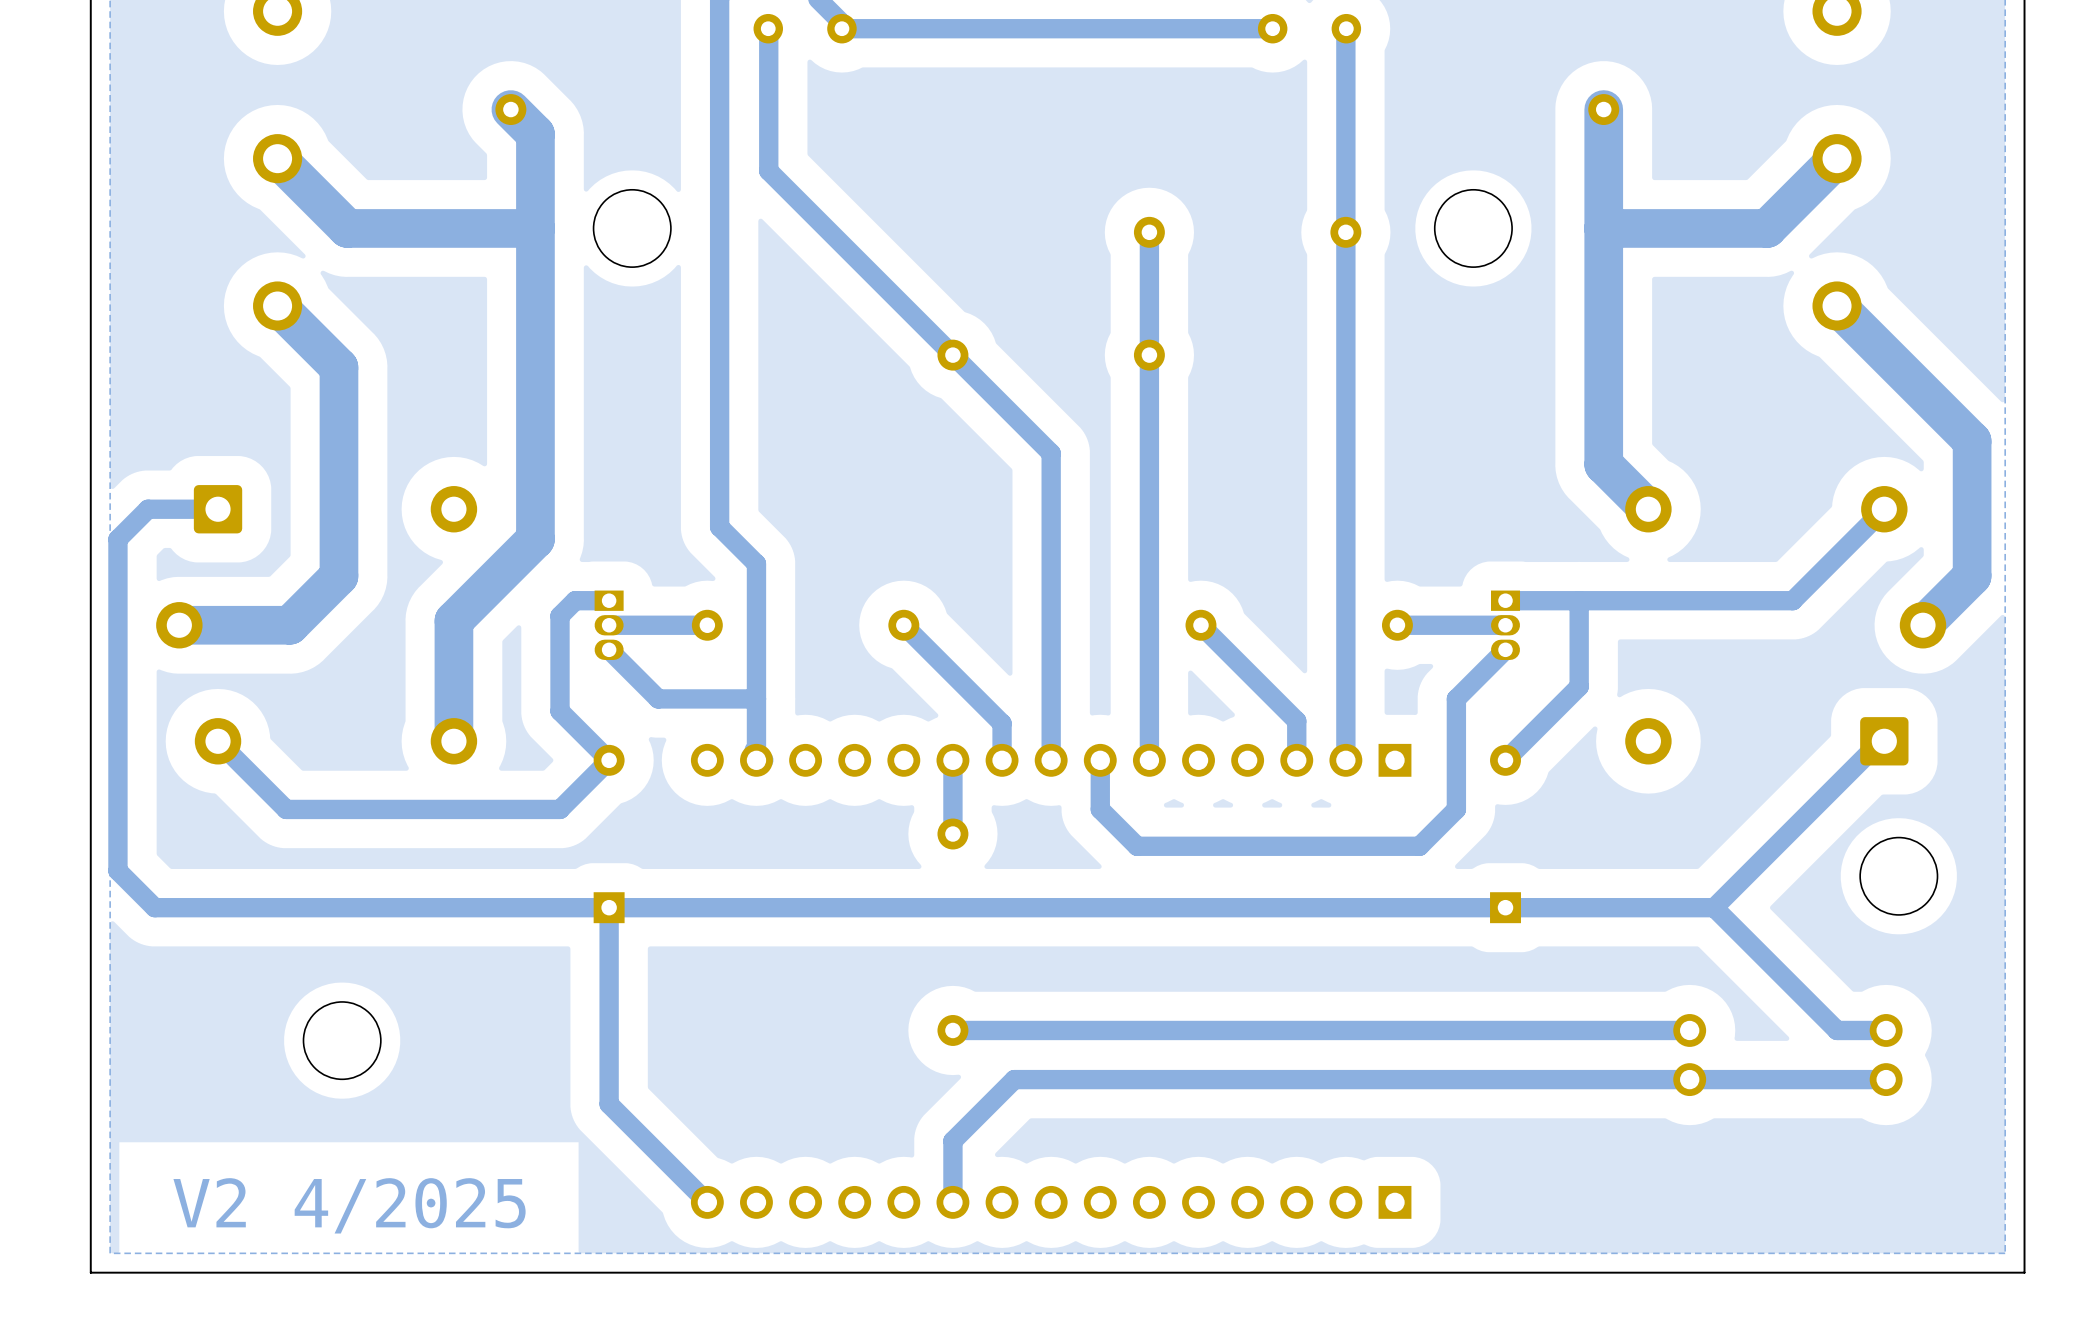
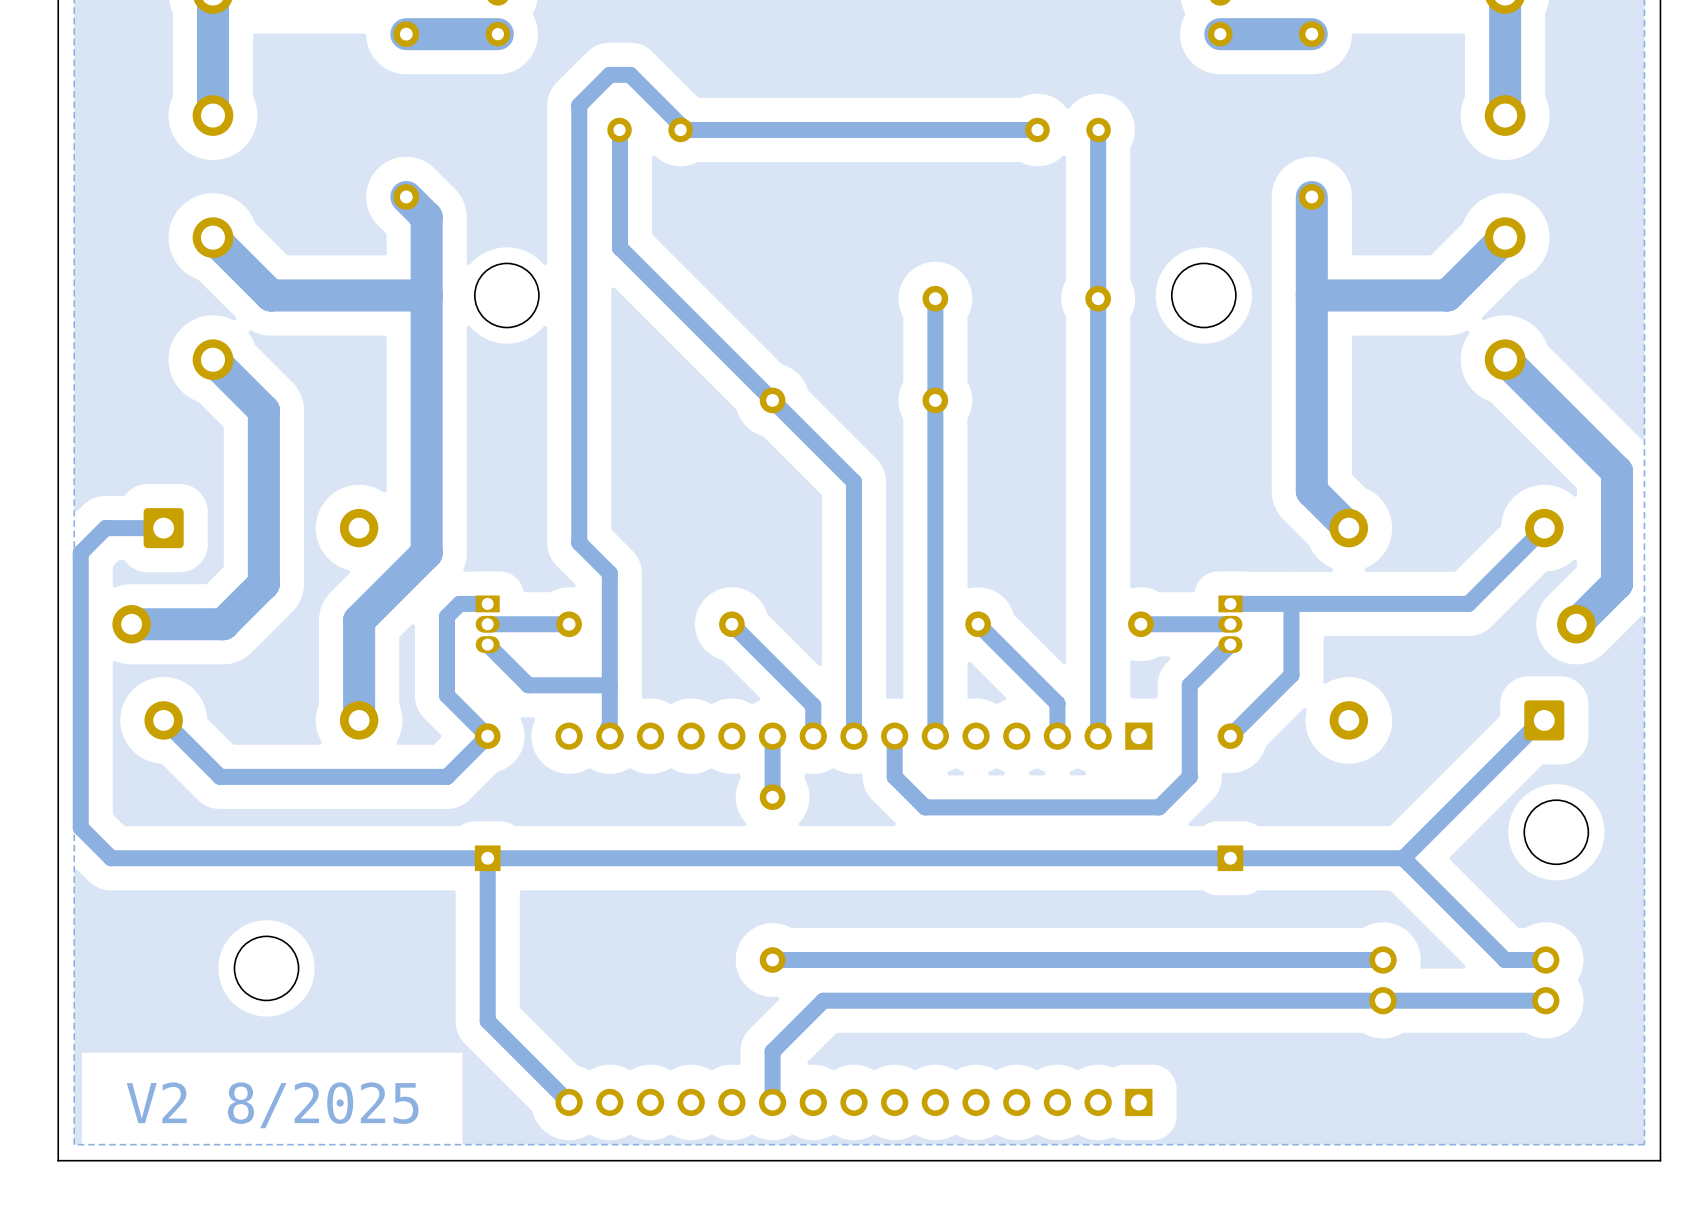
text: V2 4/2025 (349, 1205) -> V2 8/2025 (272, 1105)

